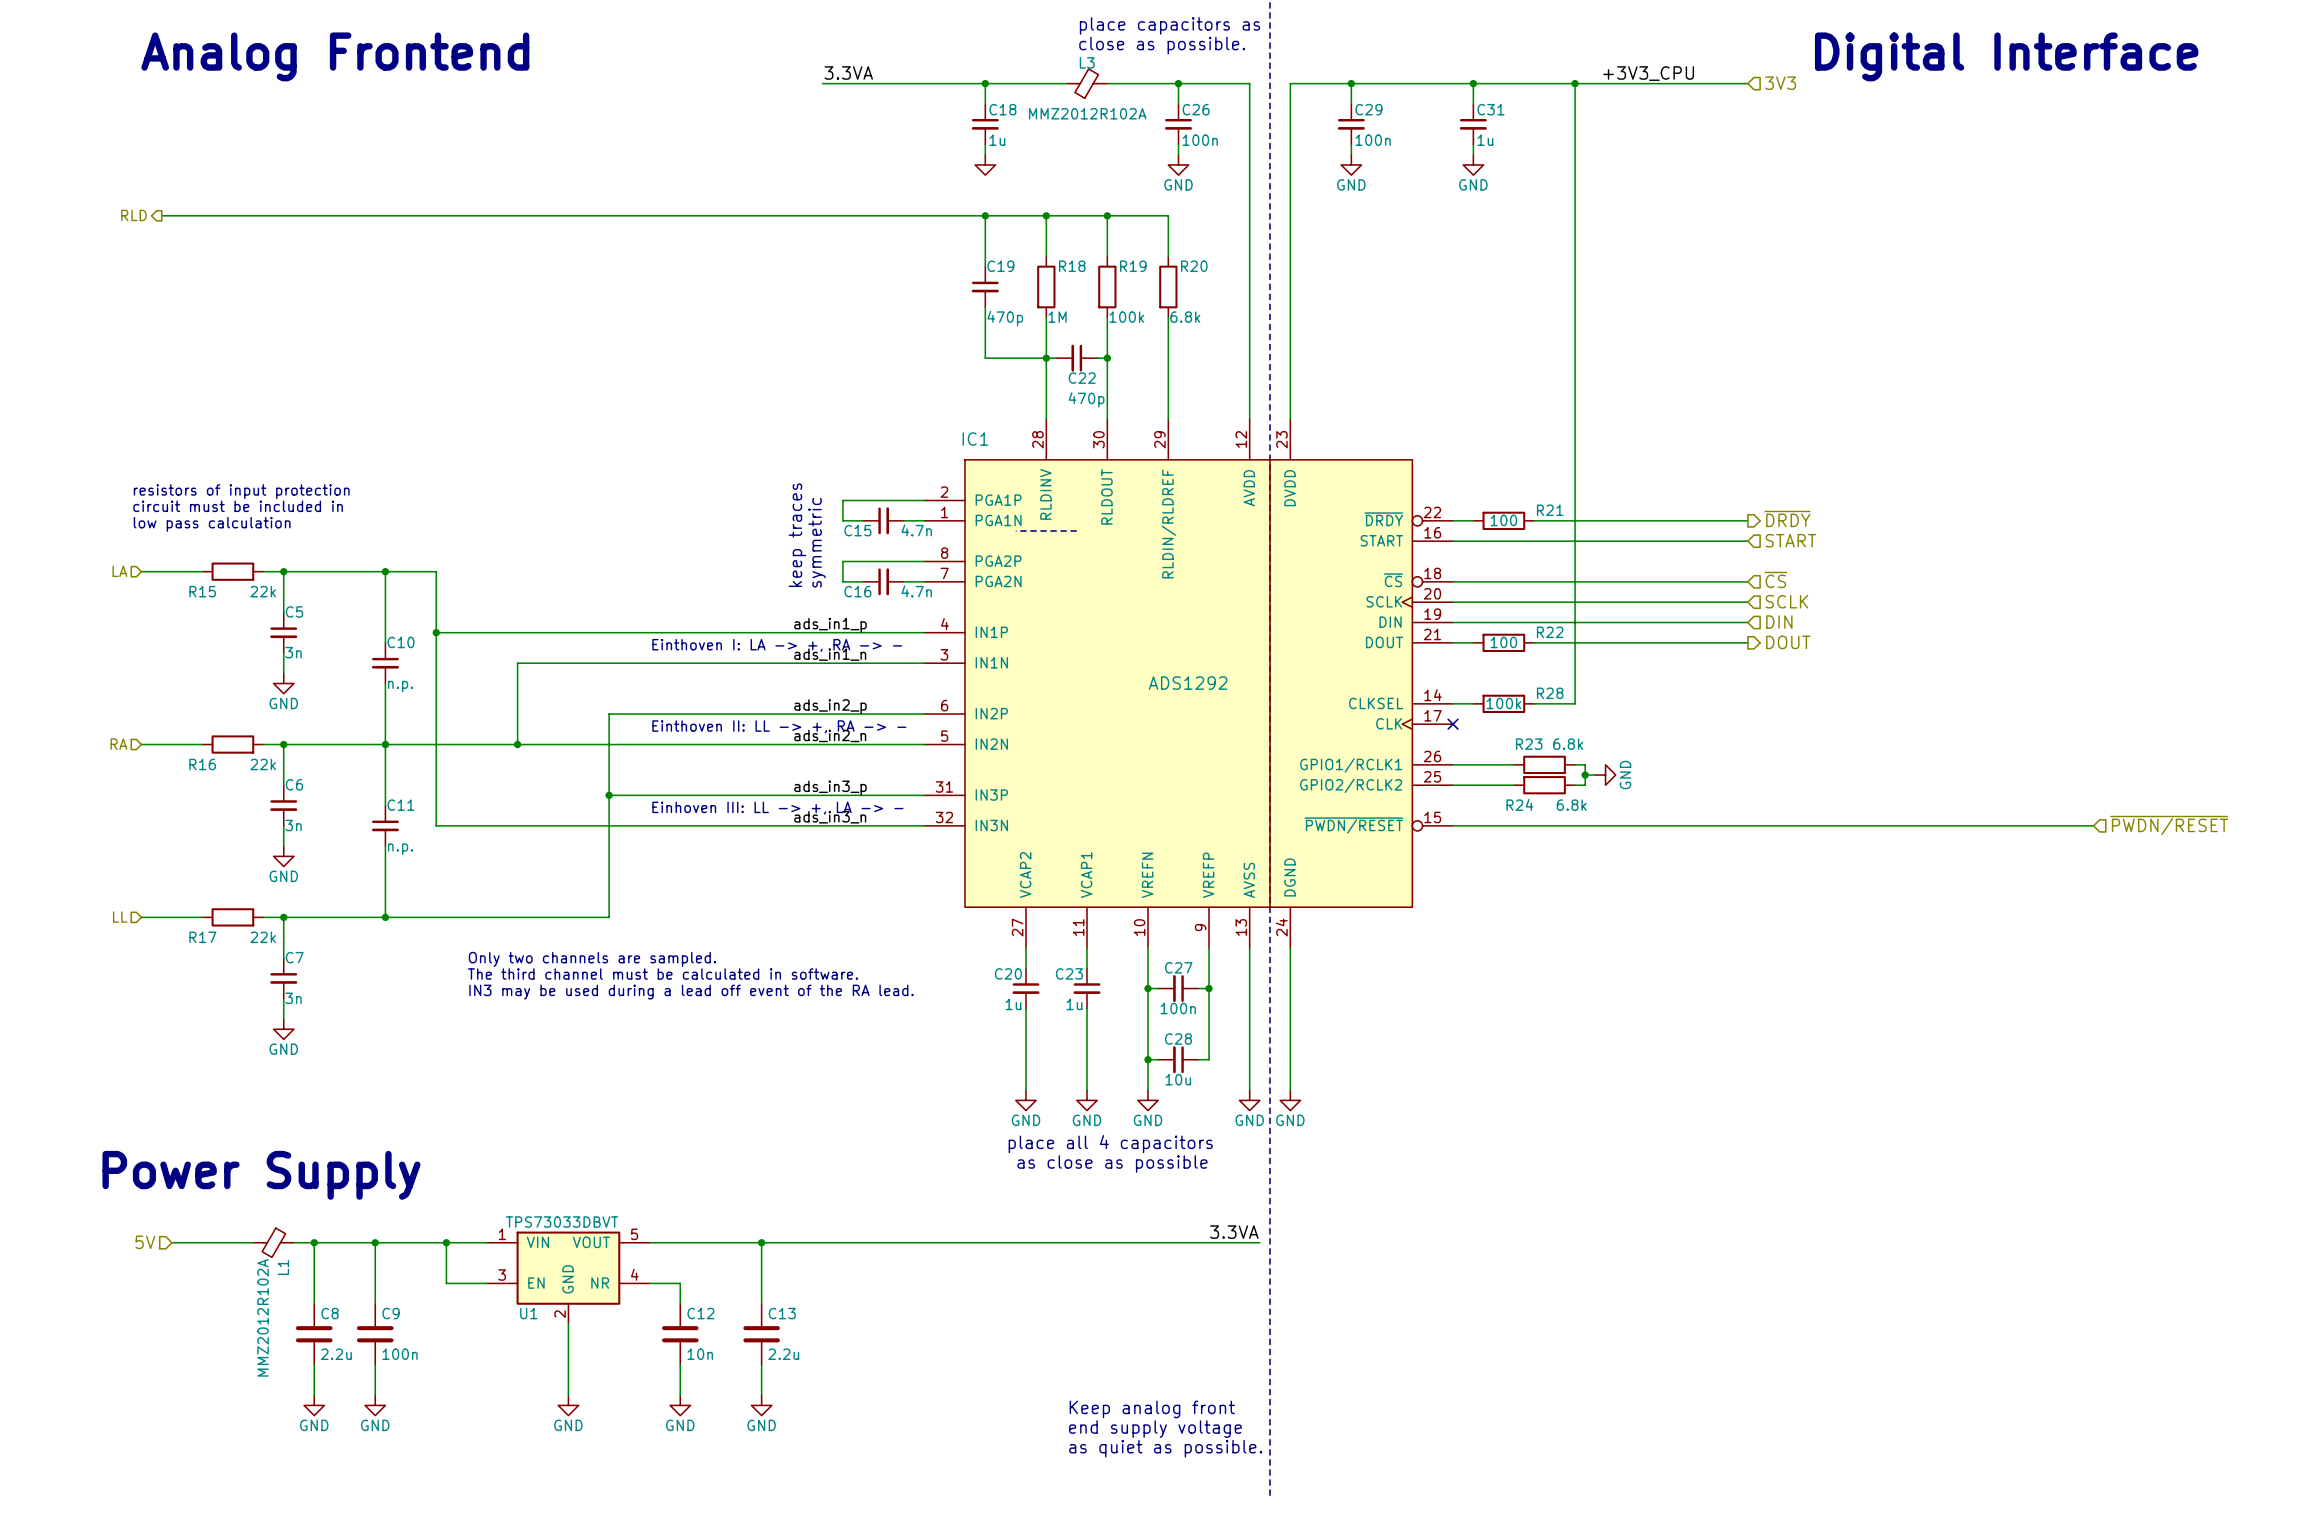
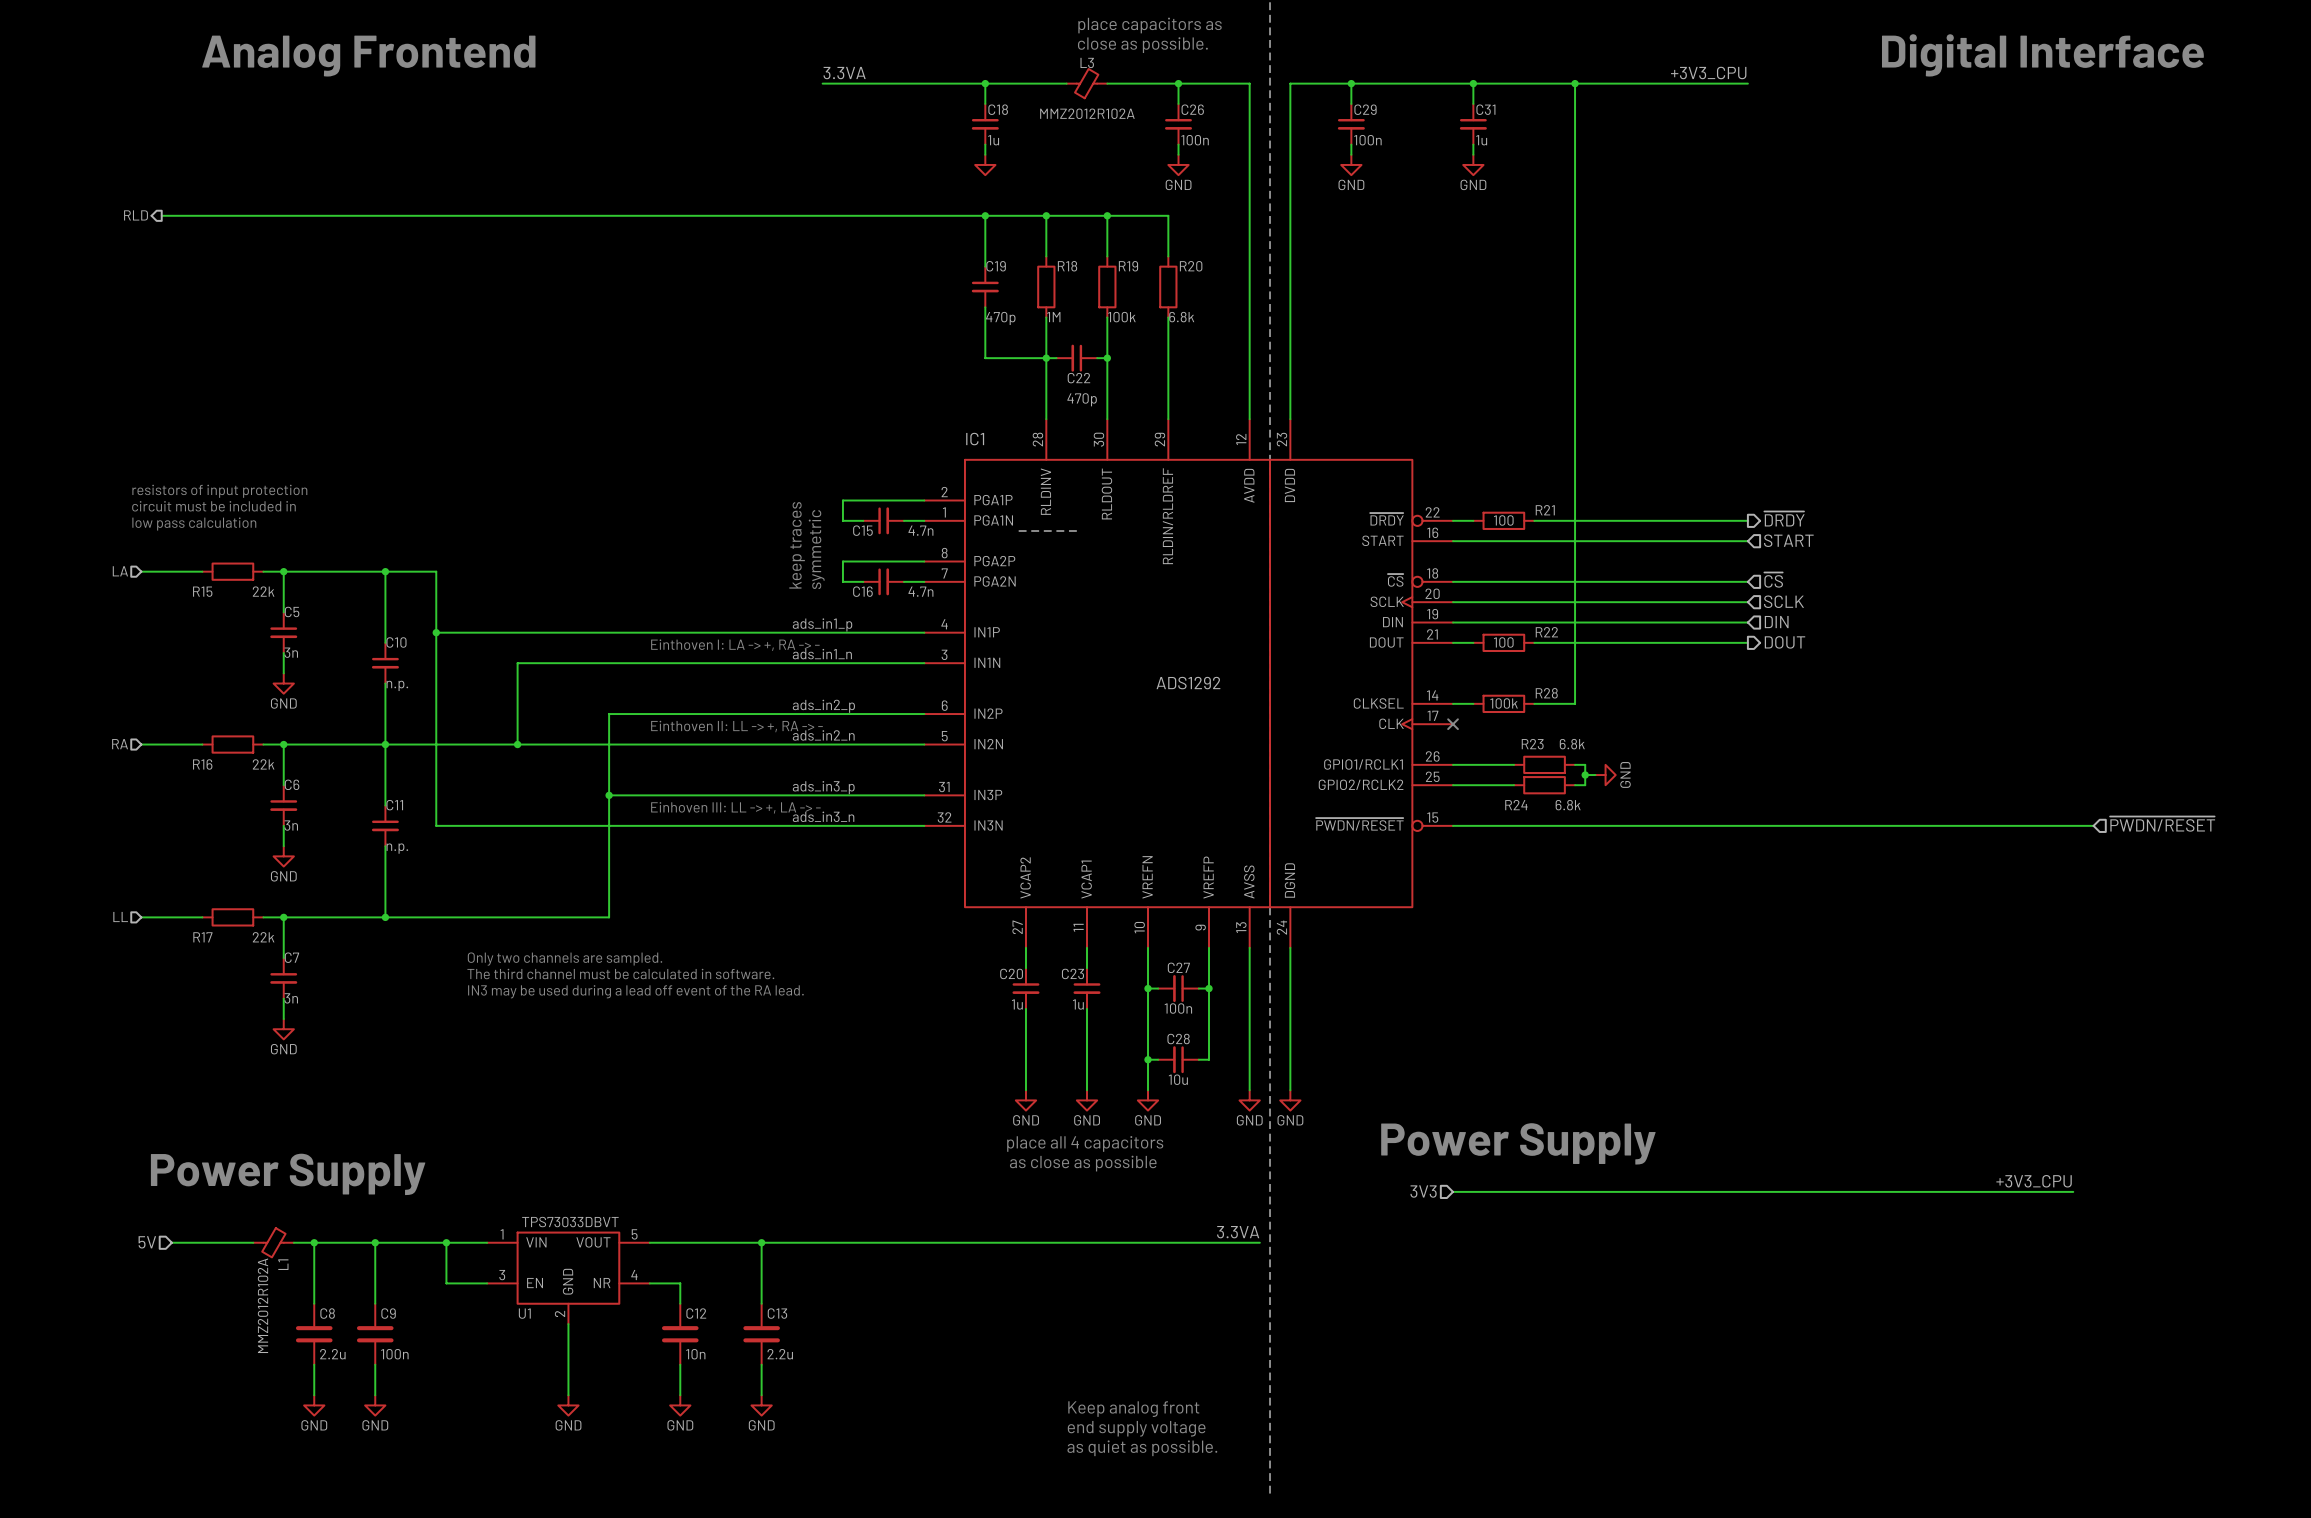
label position: +3V3_CPU (1648, 73) -> +3V3_CPU (1708, 72)
hierarchical label: 3V3 (1780, 83) -> none
text: none -> Power Supply (1518, 1143)
label: none -> +3V3_CPU (2034, 1181)
hierarchical label: none -> 3V3 (1423, 1191)
wire: none -> (1453, 1191) (2073, 1191)

